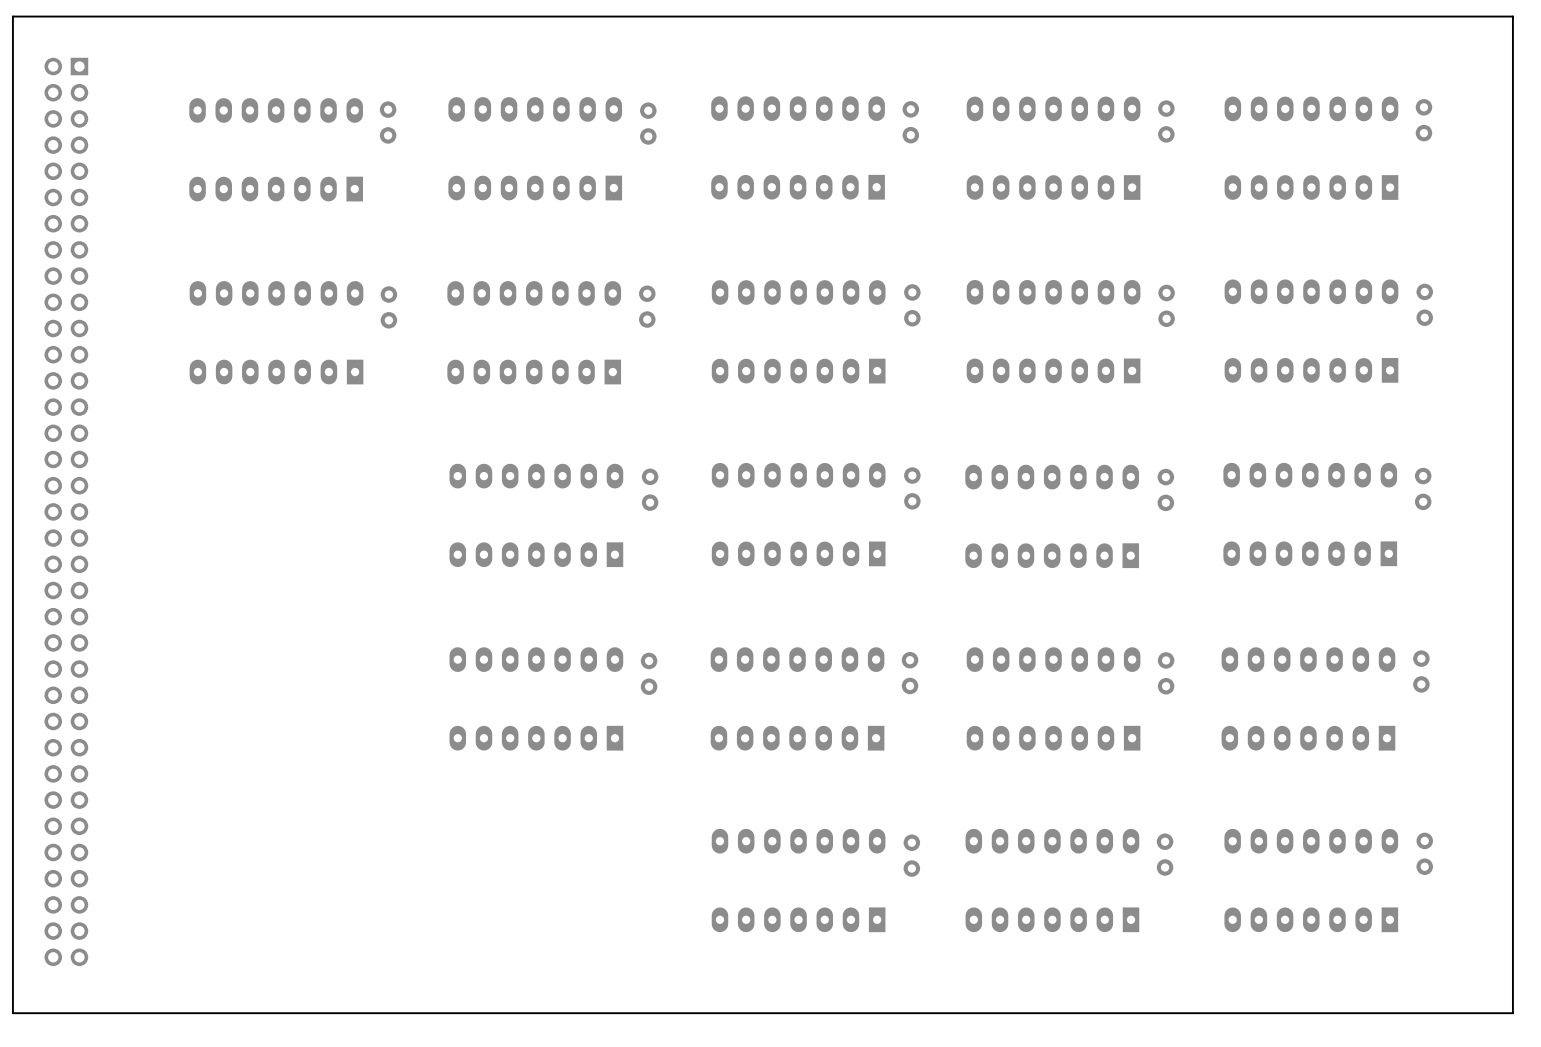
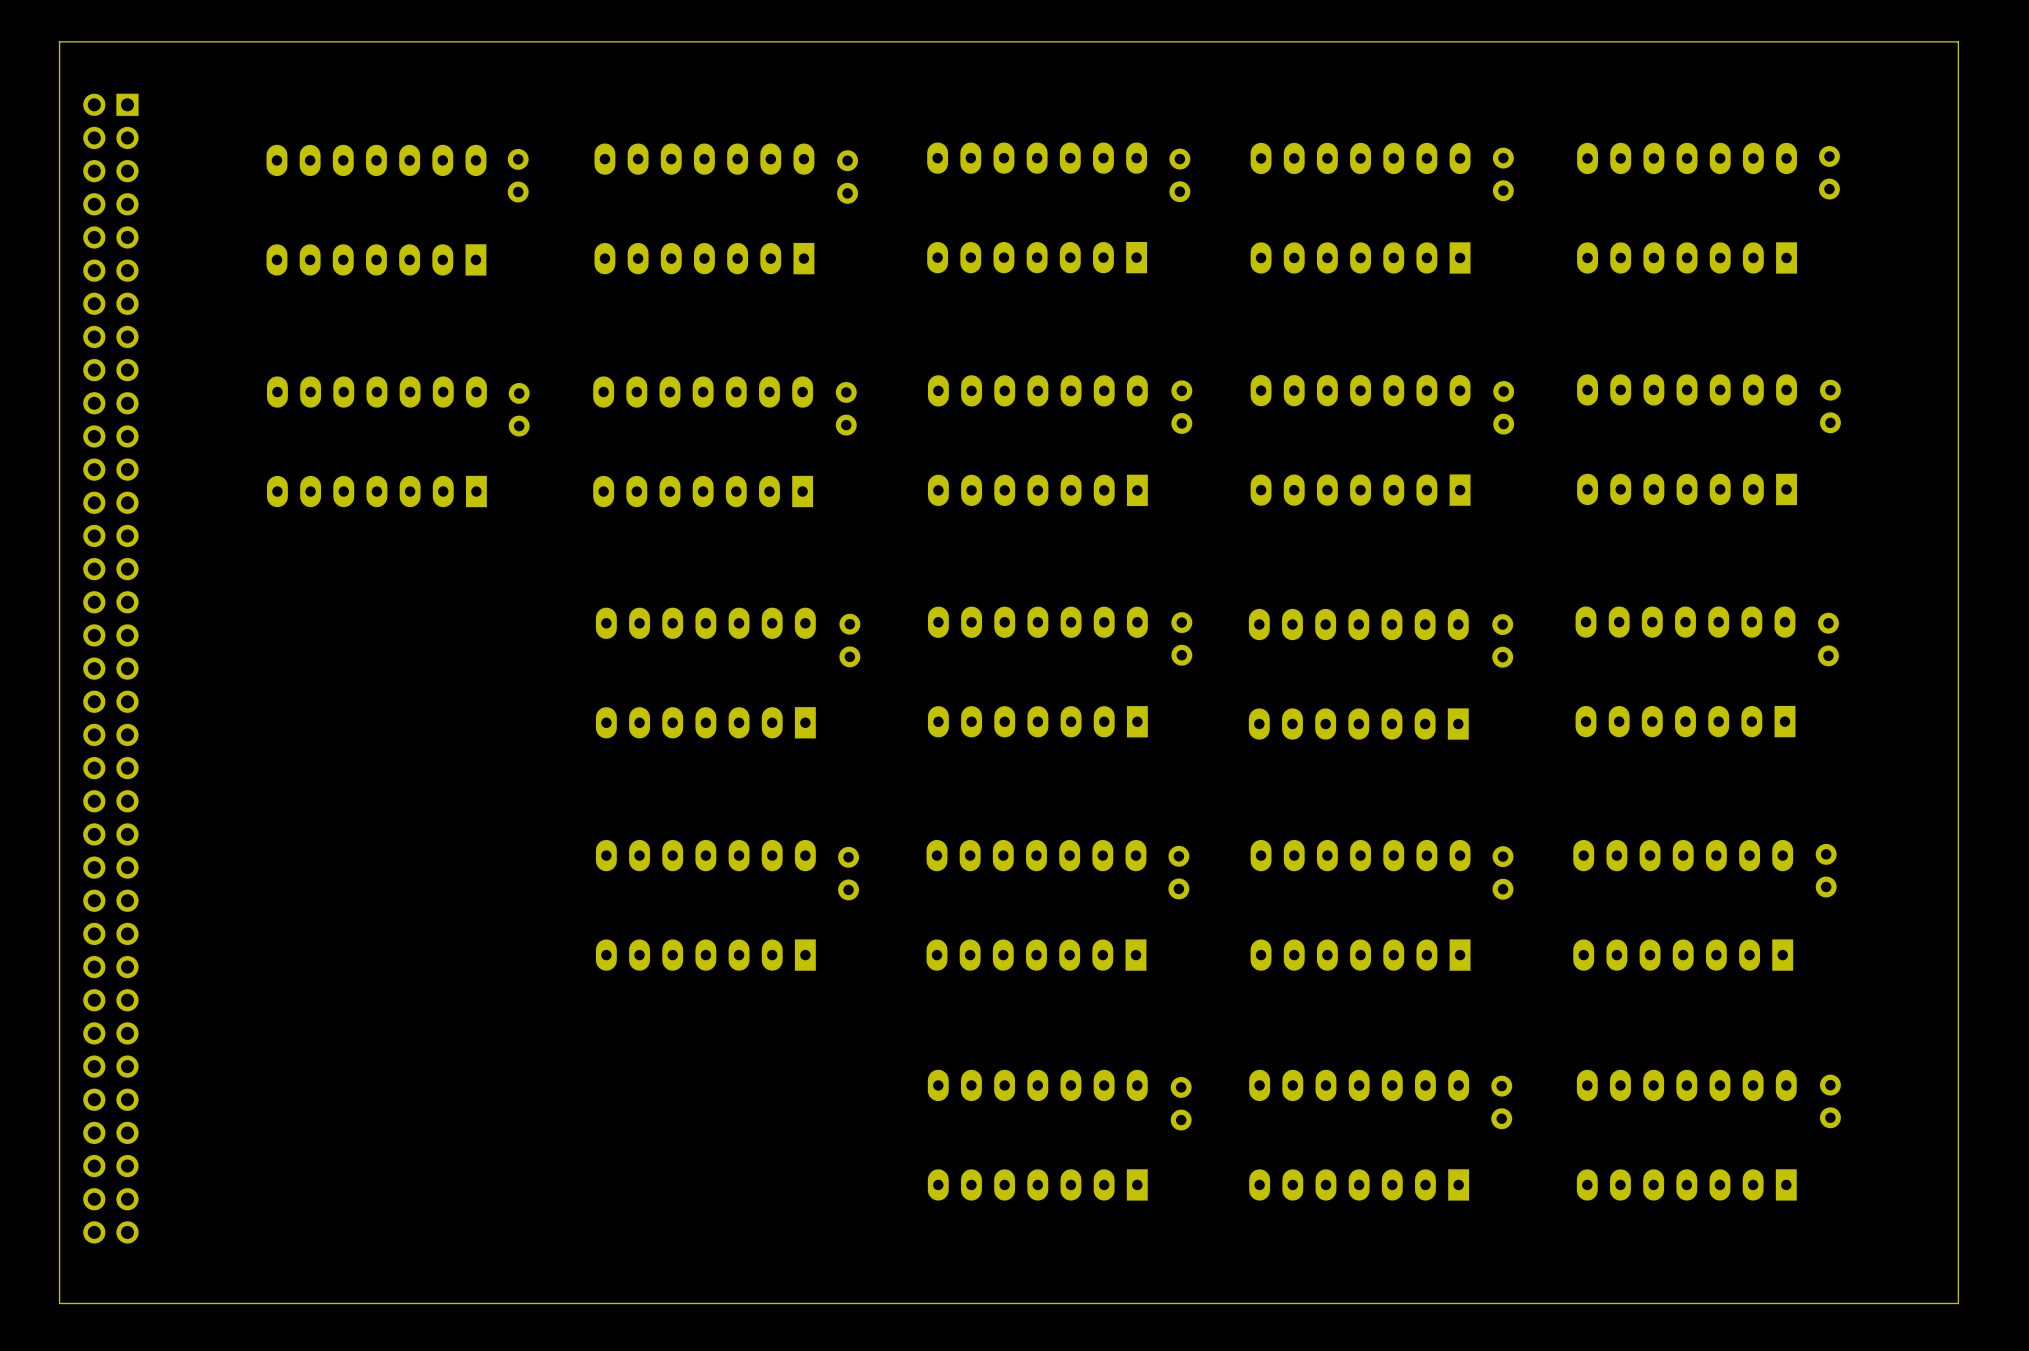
board edge: none -> (59, 41) (59, 1303) (1958, 1303) (1958, 41) (59, 41)
board edge: (1512, 16) (12, 16) (12, 1013) (1512, 1013) (1512, 16) -> none

